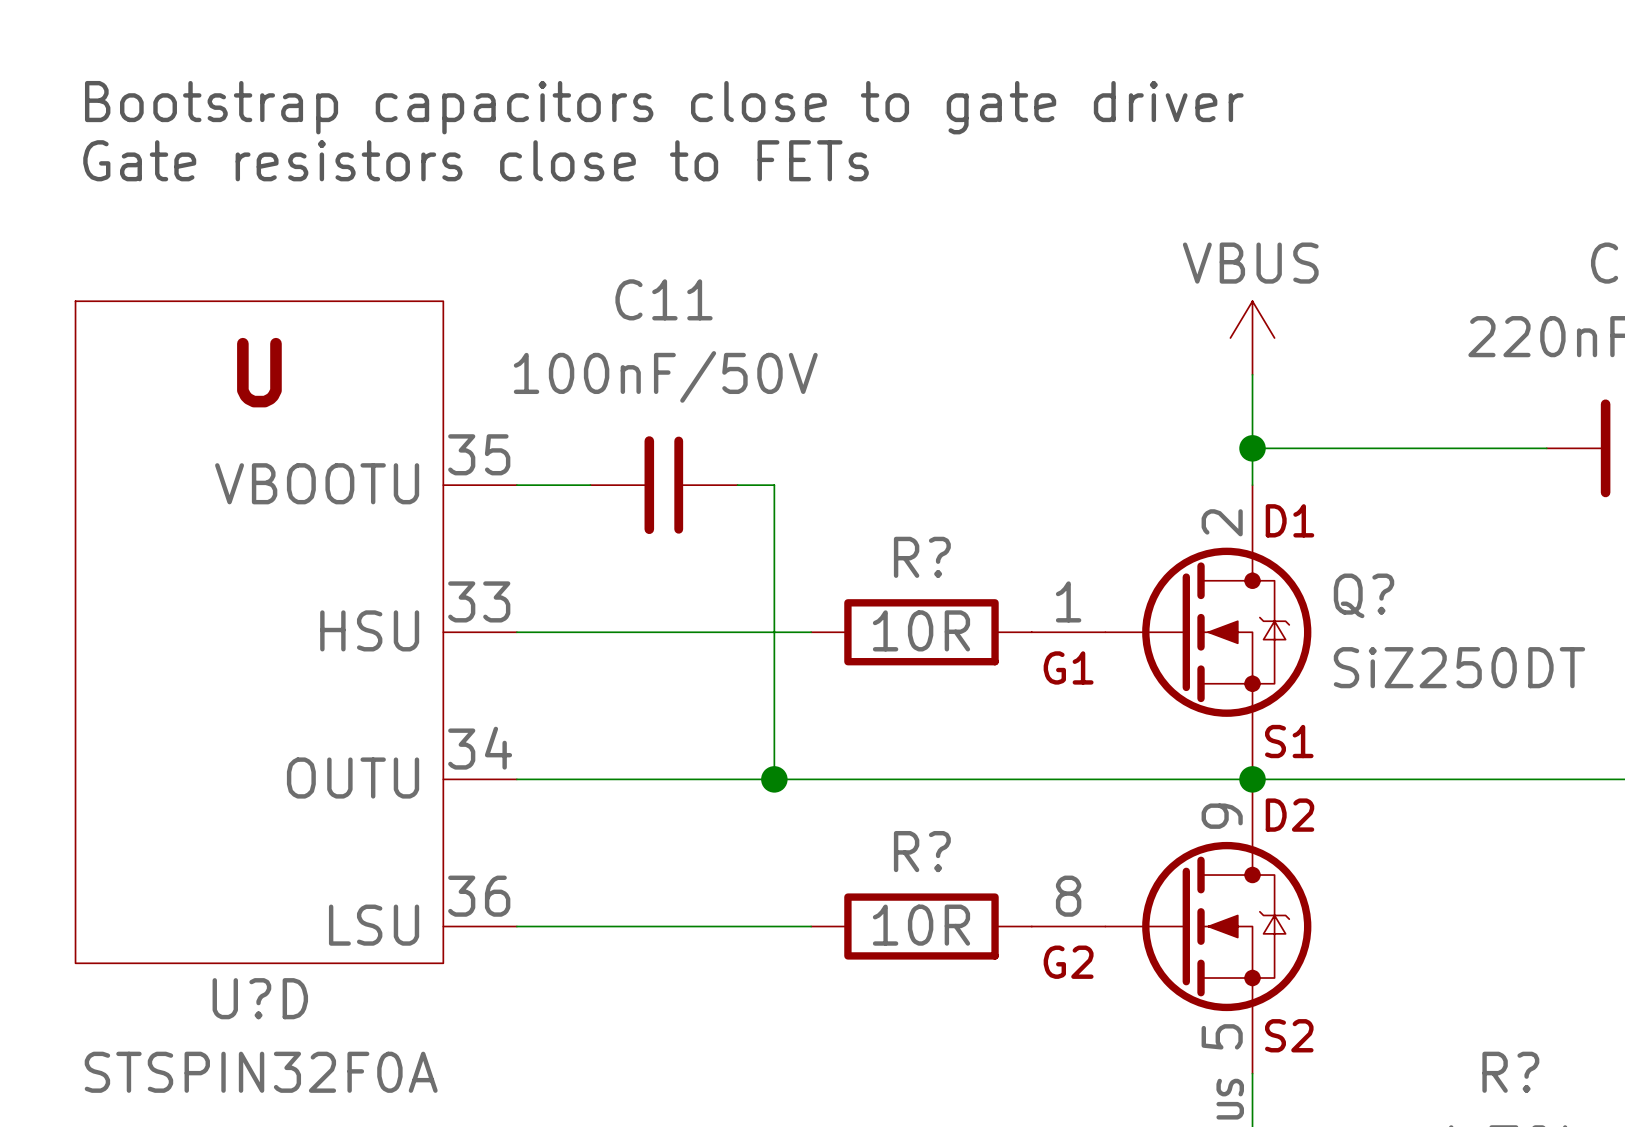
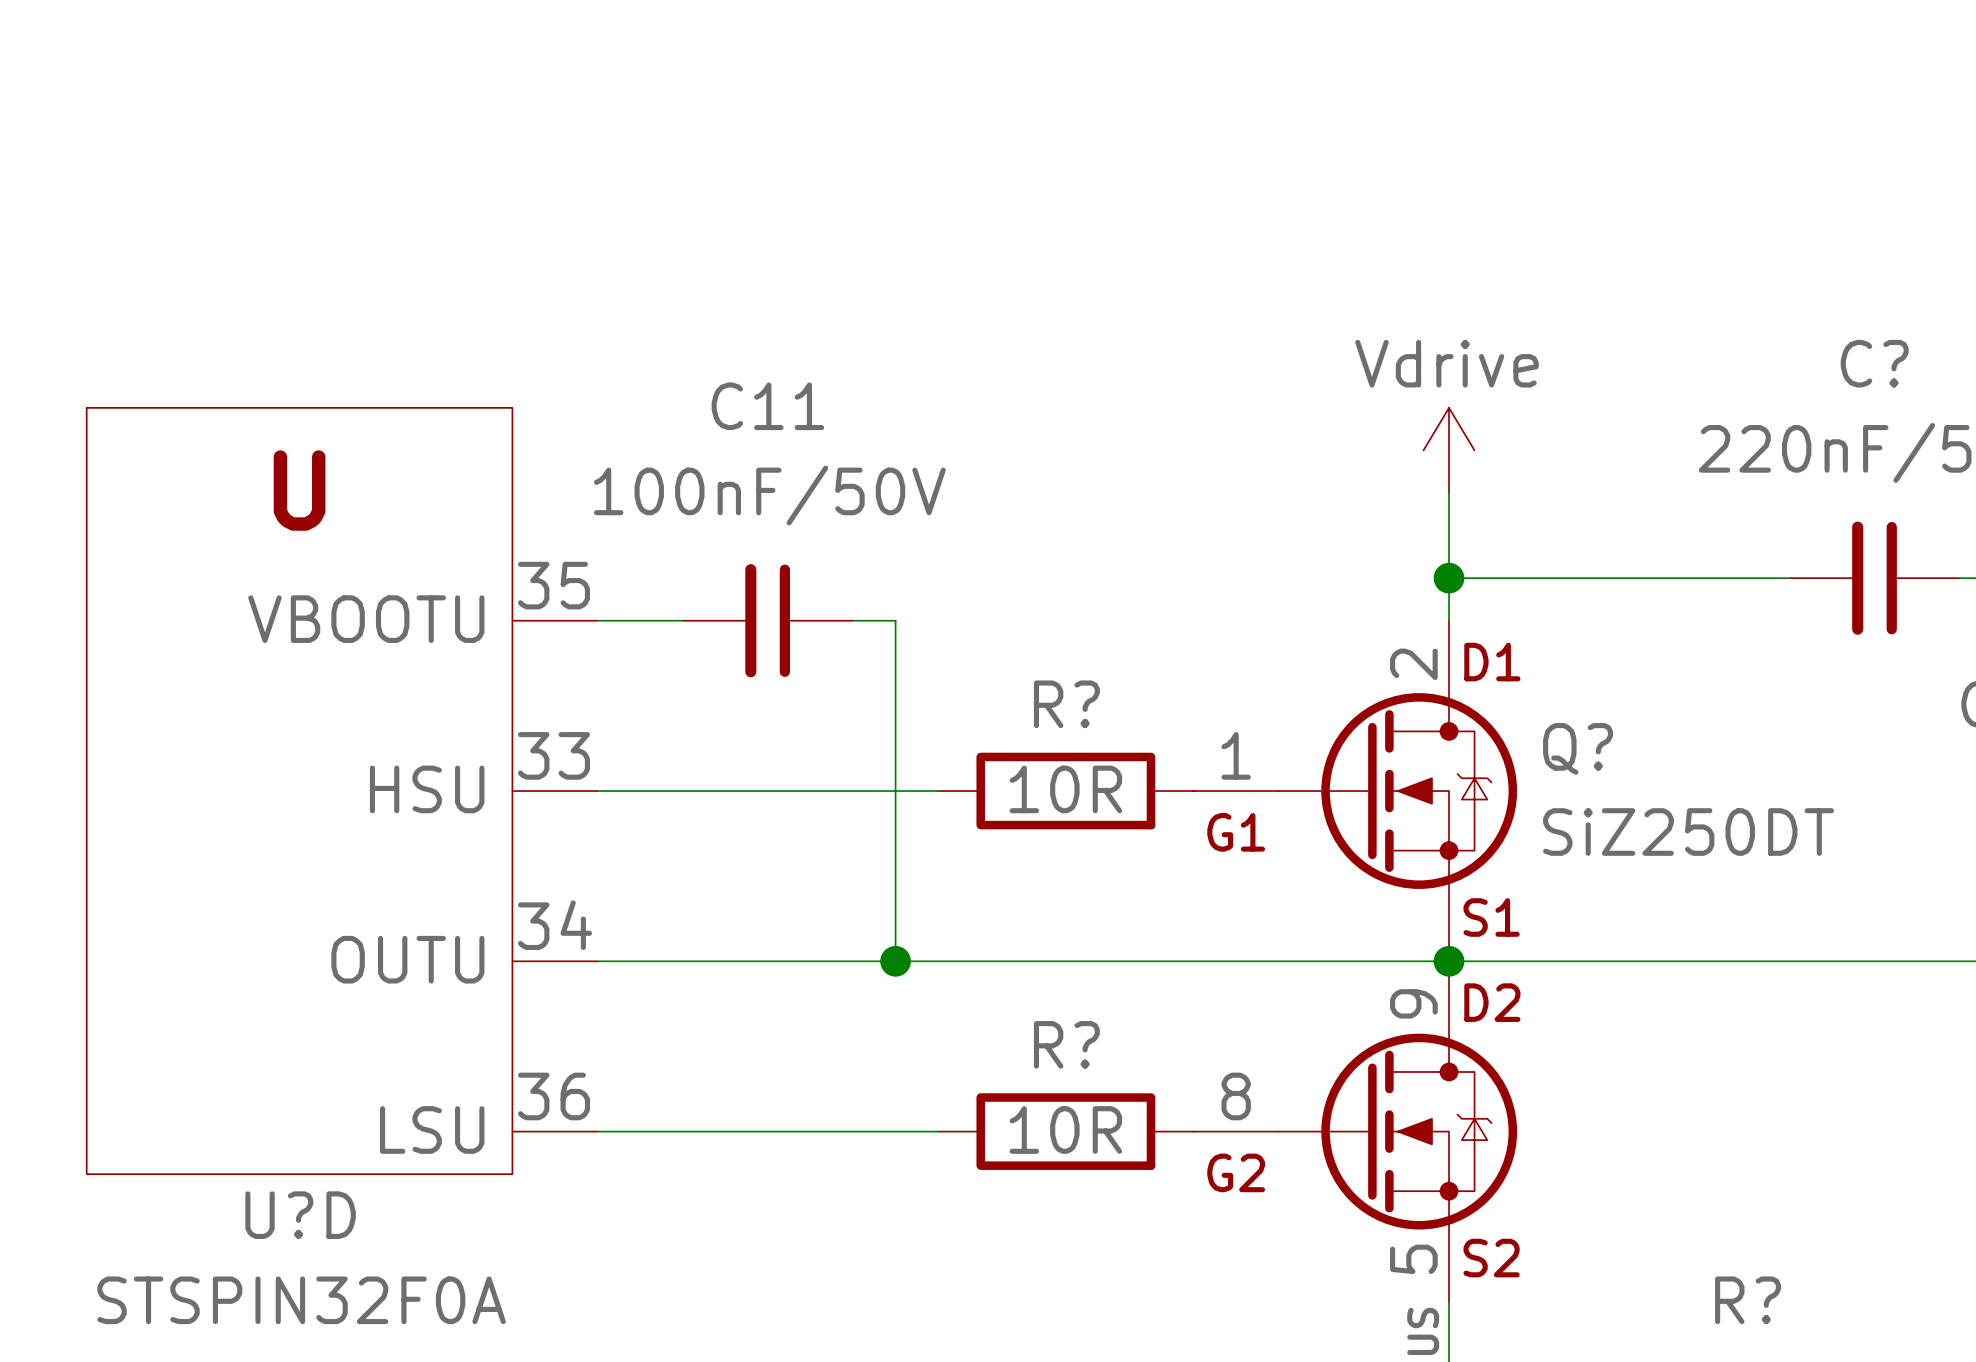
text: Bootstrap capacitors close to gate driver (664, 107) -> none
text: Gate resistors close to FETs (476, 160) -> none
power symbol: VBUS (1252, 338) -> Vdrive (1449, 450)

